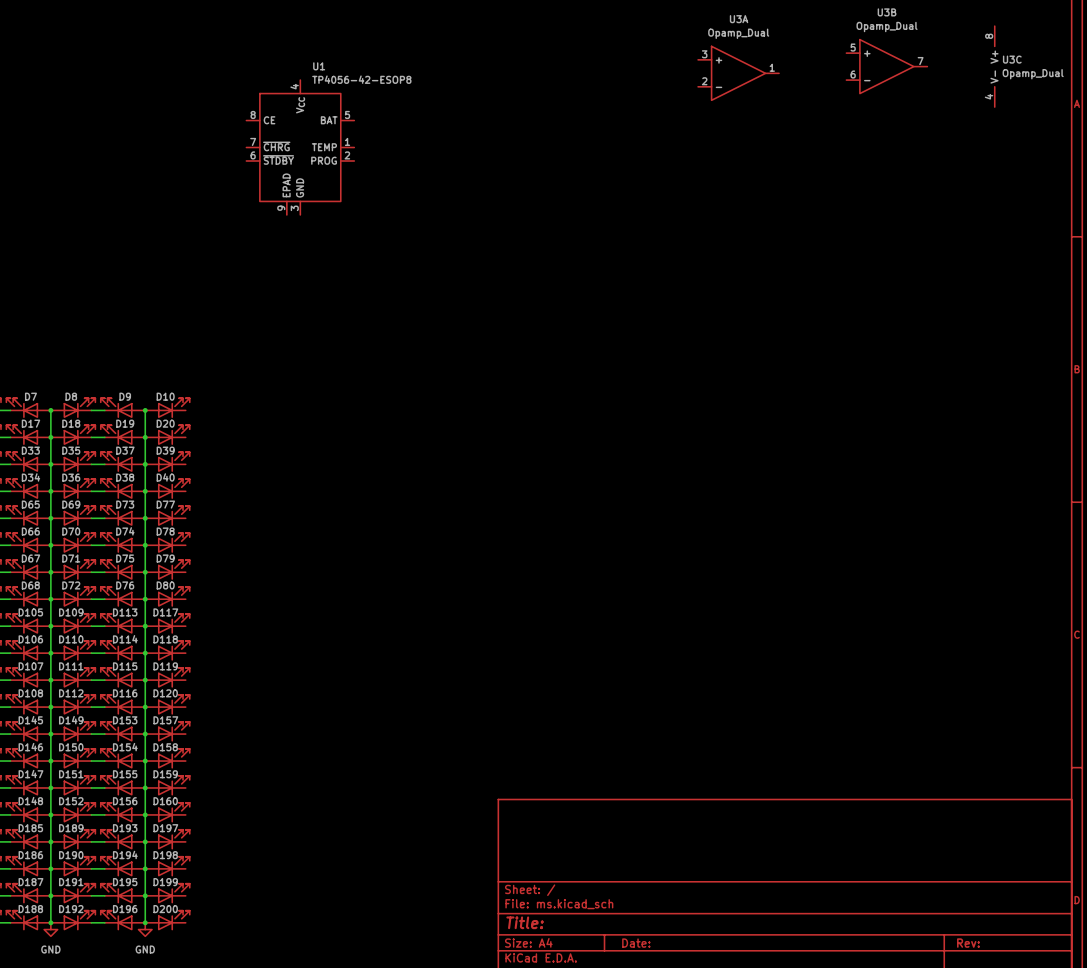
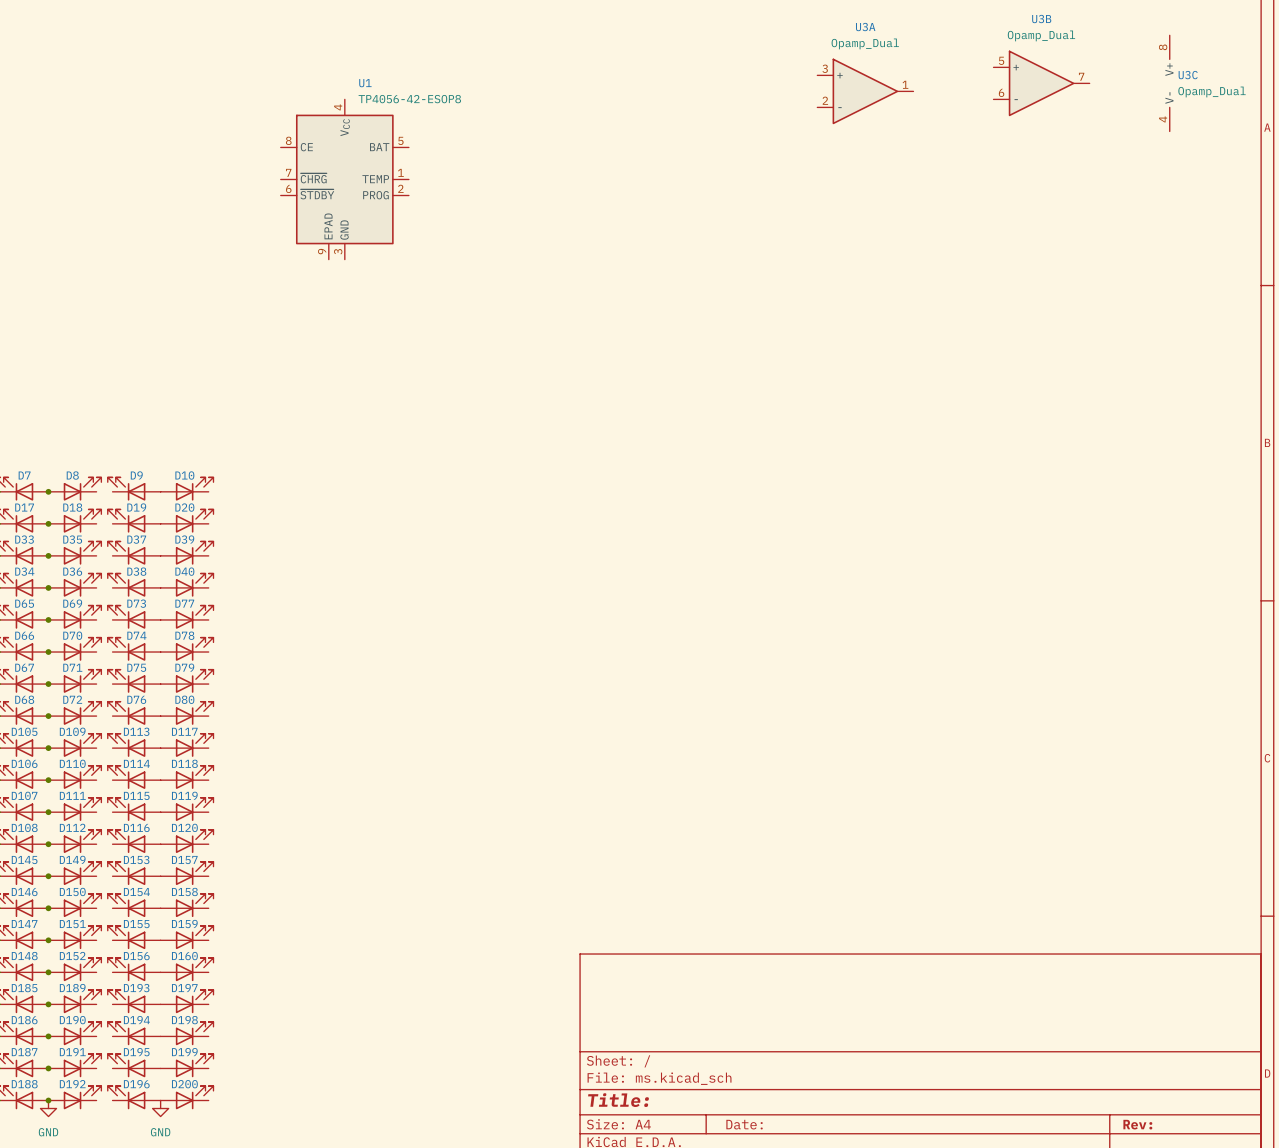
wire: (50, 410) (50, 922) -> none
wire: (91, 410) (104, 410) -> none
wire: (145, 410) (145, 922) -> none
junction: (145, 410) -> none
wire: (91, 437) (104, 437) -> none
junction: (145, 437) -> none
wire: (91, 464) (104, 464) -> none
junction: (145, 464) -> none
wire: (91, 491) (104, 491) -> none
junction: (145, 491) -> none
wire: (91, 518) (104, 518) -> none
junction: (145, 518) -> none
wire: (91, 545) (104, 545) -> none
junction: (145, 545) -> none
wire: (91, 572) (104, 572) -> none
junction: (145, 572) -> none
wire: (91, 599) (104, 599) -> none
junction: (145, 599) -> none
wire: (91, 626) (104, 626) -> none
junction: (145, 626) -> none
wire: (91, 653) (104, 653) -> none
junction: (145, 653) -> none
wire: (91, 680) (104, 680) -> none
junction: (145, 680) -> none
wire: (91, 707) (104, 707) -> none
junction: (145, 707) -> none
wire: (91, 734) (104, 734) -> none
junction: (145, 734) -> none
wire: (91, 761) (104, 761) -> none
junction: (145, 761) -> none
wire: (91, 787) (104, 787) -> none
junction: (145, 787) -> none
wire: (91, 814) (104, 814) -> none
junction: (145, 814) -> none
wire: (91, 841) (104, 841) -> none
junction: (145, 841) -> none
wire: (91, 868) (104, 868) -> none
junction: (145, 868) -> none
wire: (91, 895) (104, 895) -> none
junction: (145, 895) -> none
wire: (91, 922) (104, 922) -> none
junction: (145, 922) -> none

